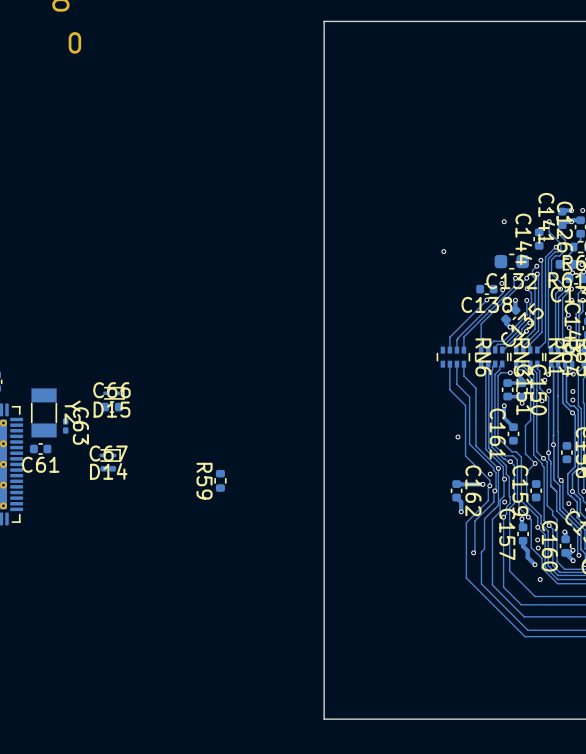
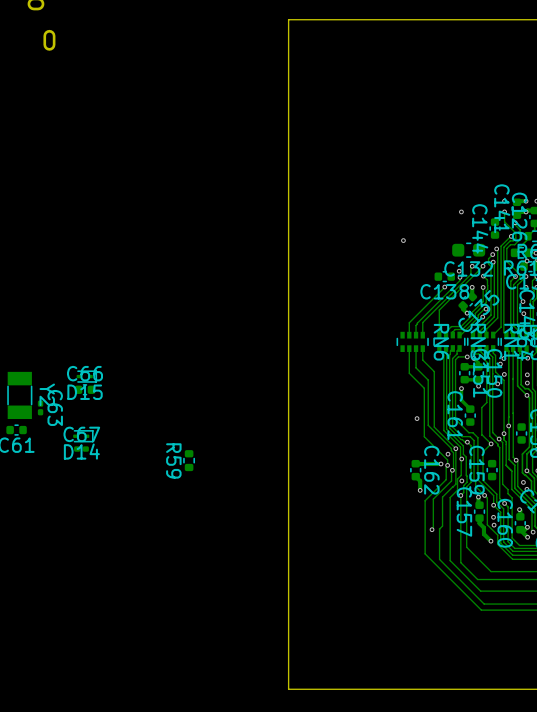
via: (540, 579) -> none

